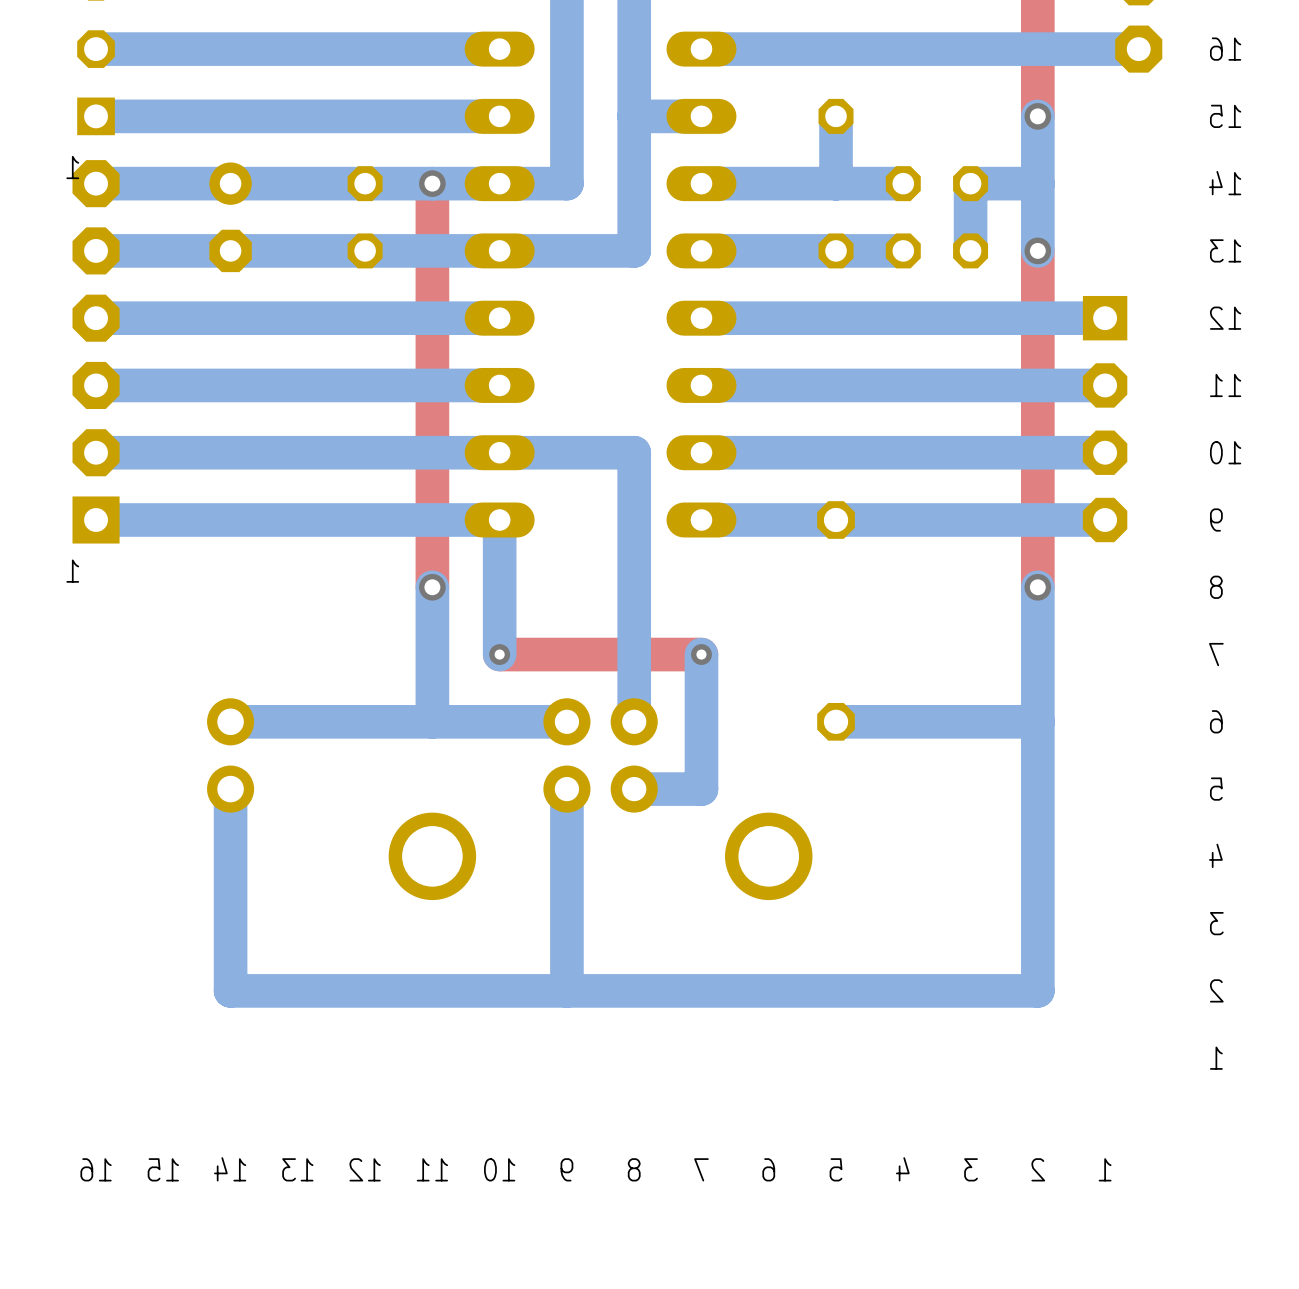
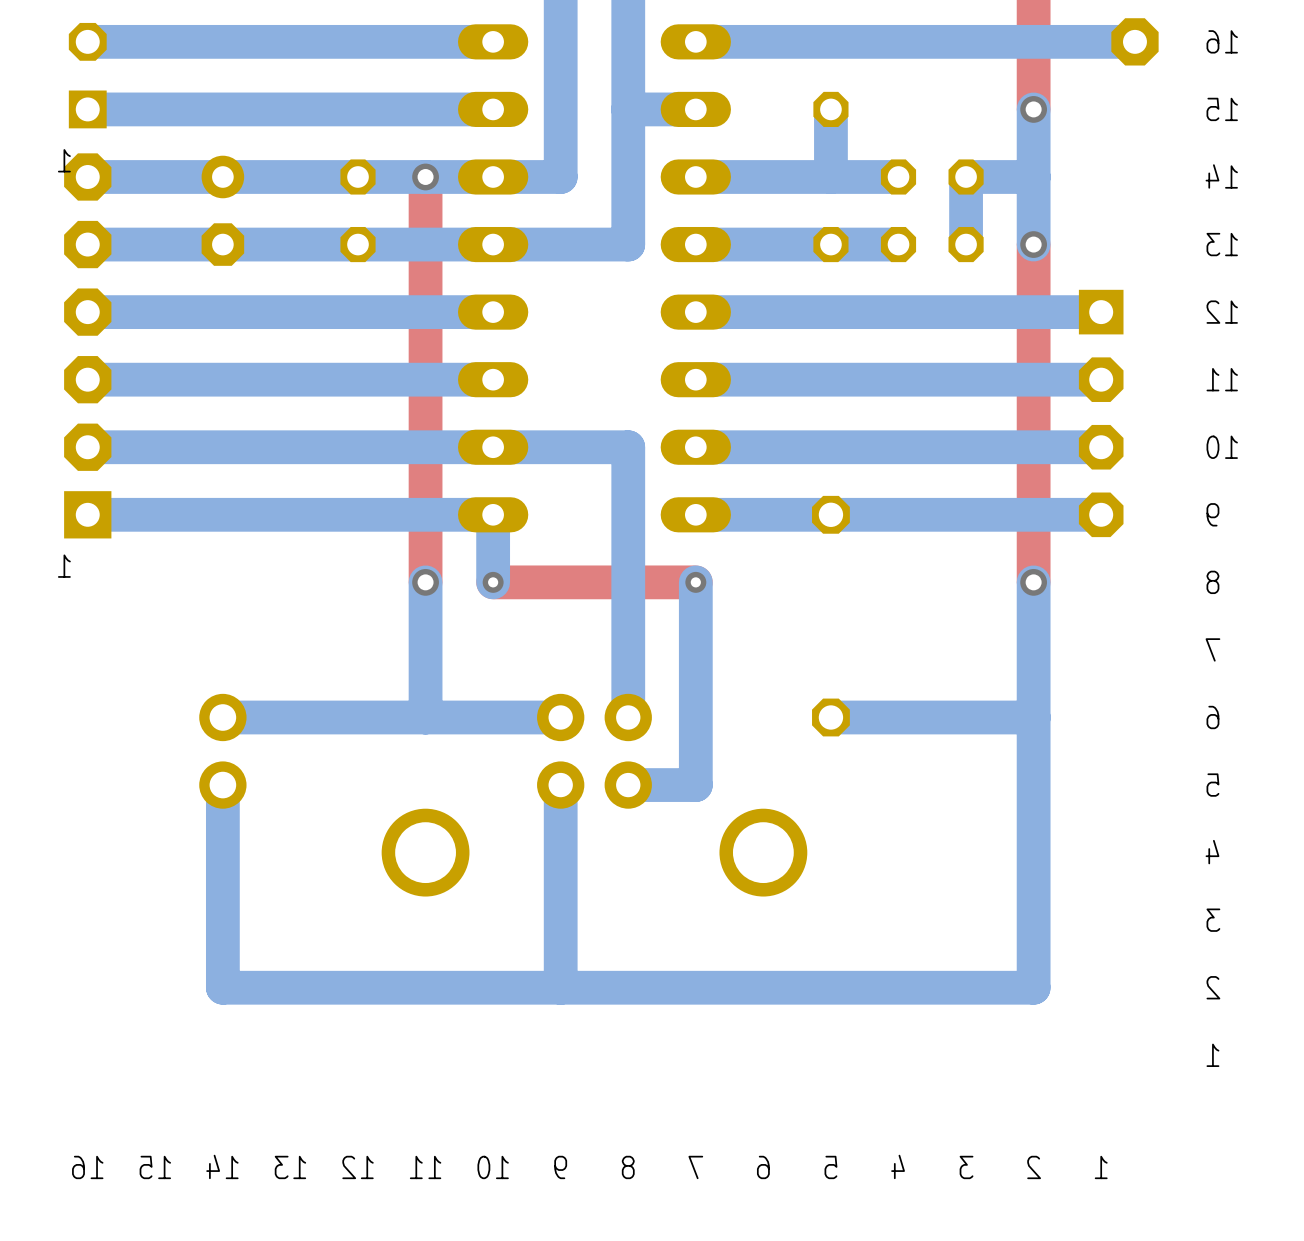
bottom track: (499, 587) (499, 654) -> (695, 582) (695, 649)
via position: (499, 654) -> (493, 582)
top track: (701, 654) (499, 654) -> (695, 582) (493, 582)
via position: (701, 654) -> (695, 582)

